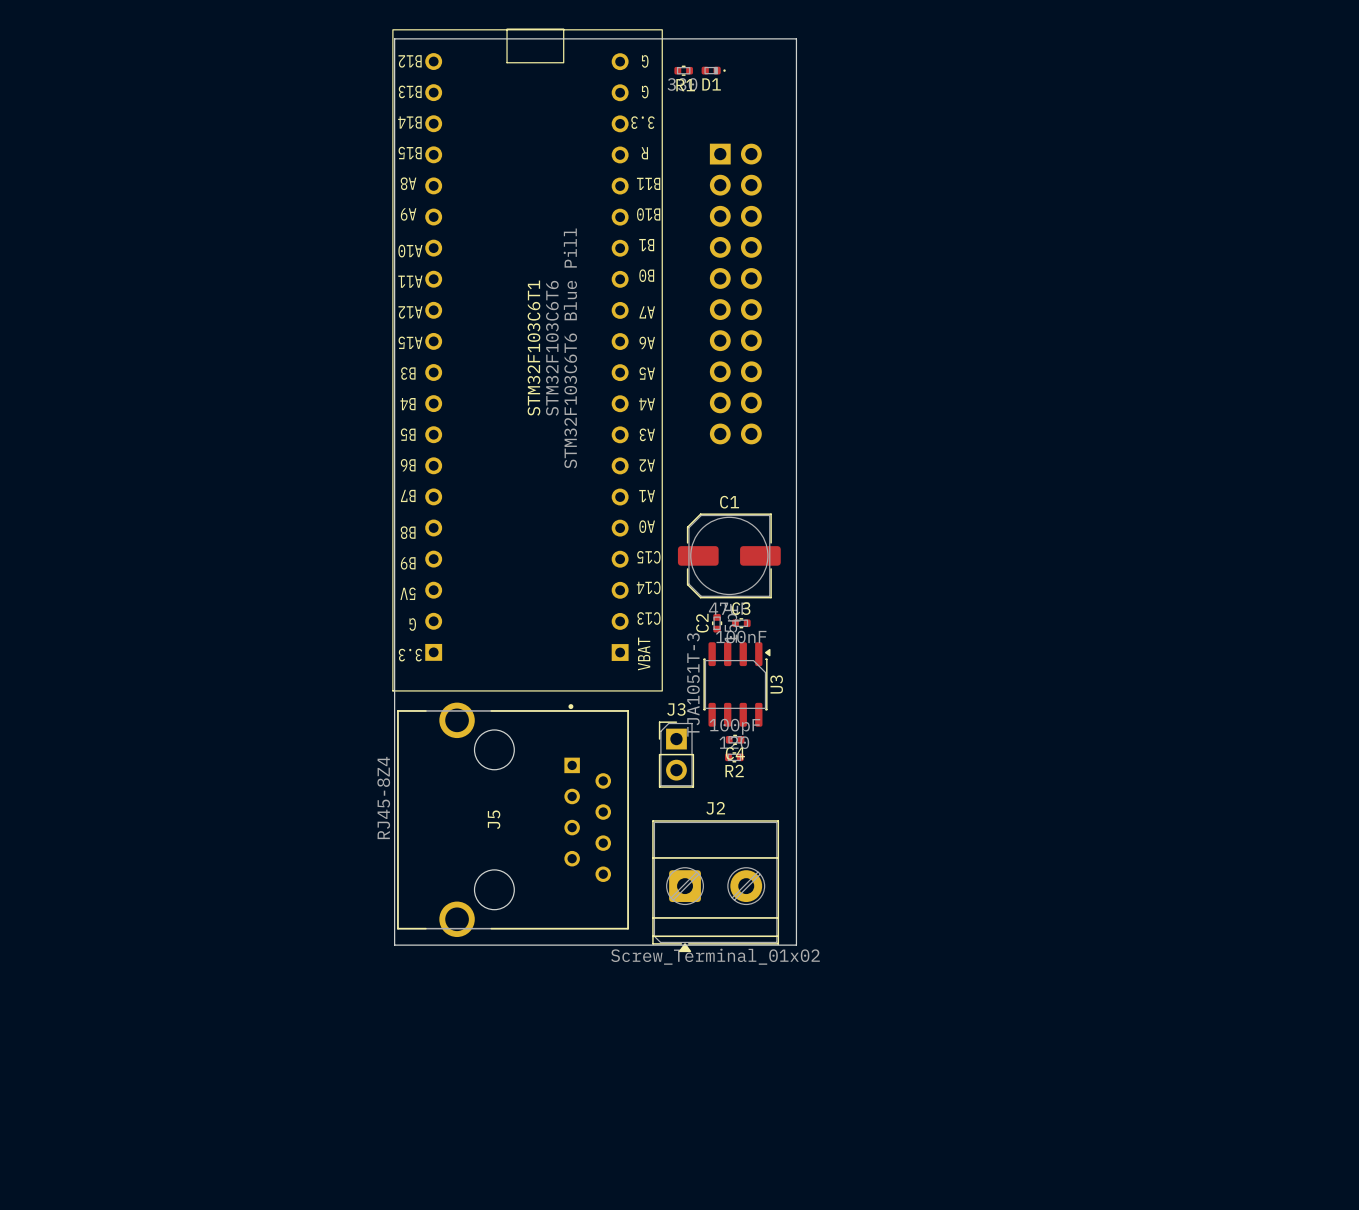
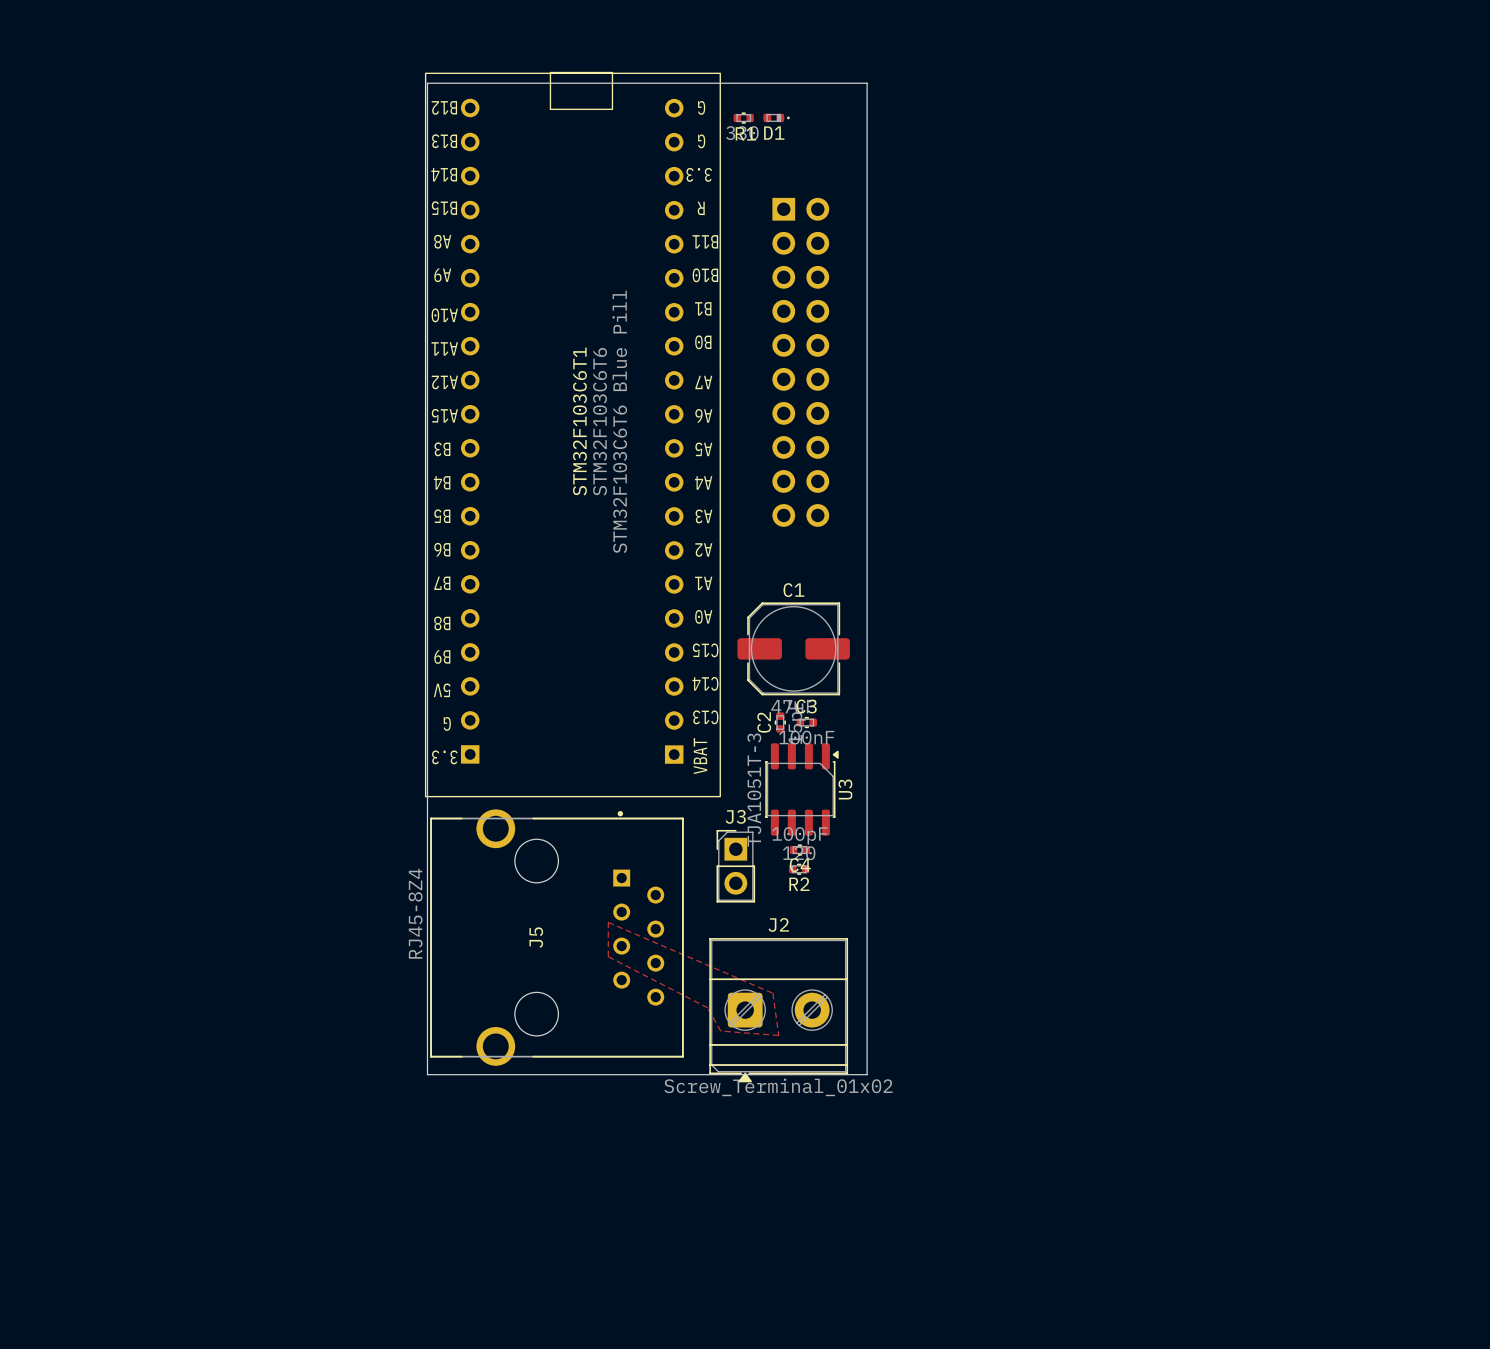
top zone outline: none -> (608, 922) (772, 993) (778, 1035) (720, 1031) (707, 1007) (608, 956) (608, 922)

